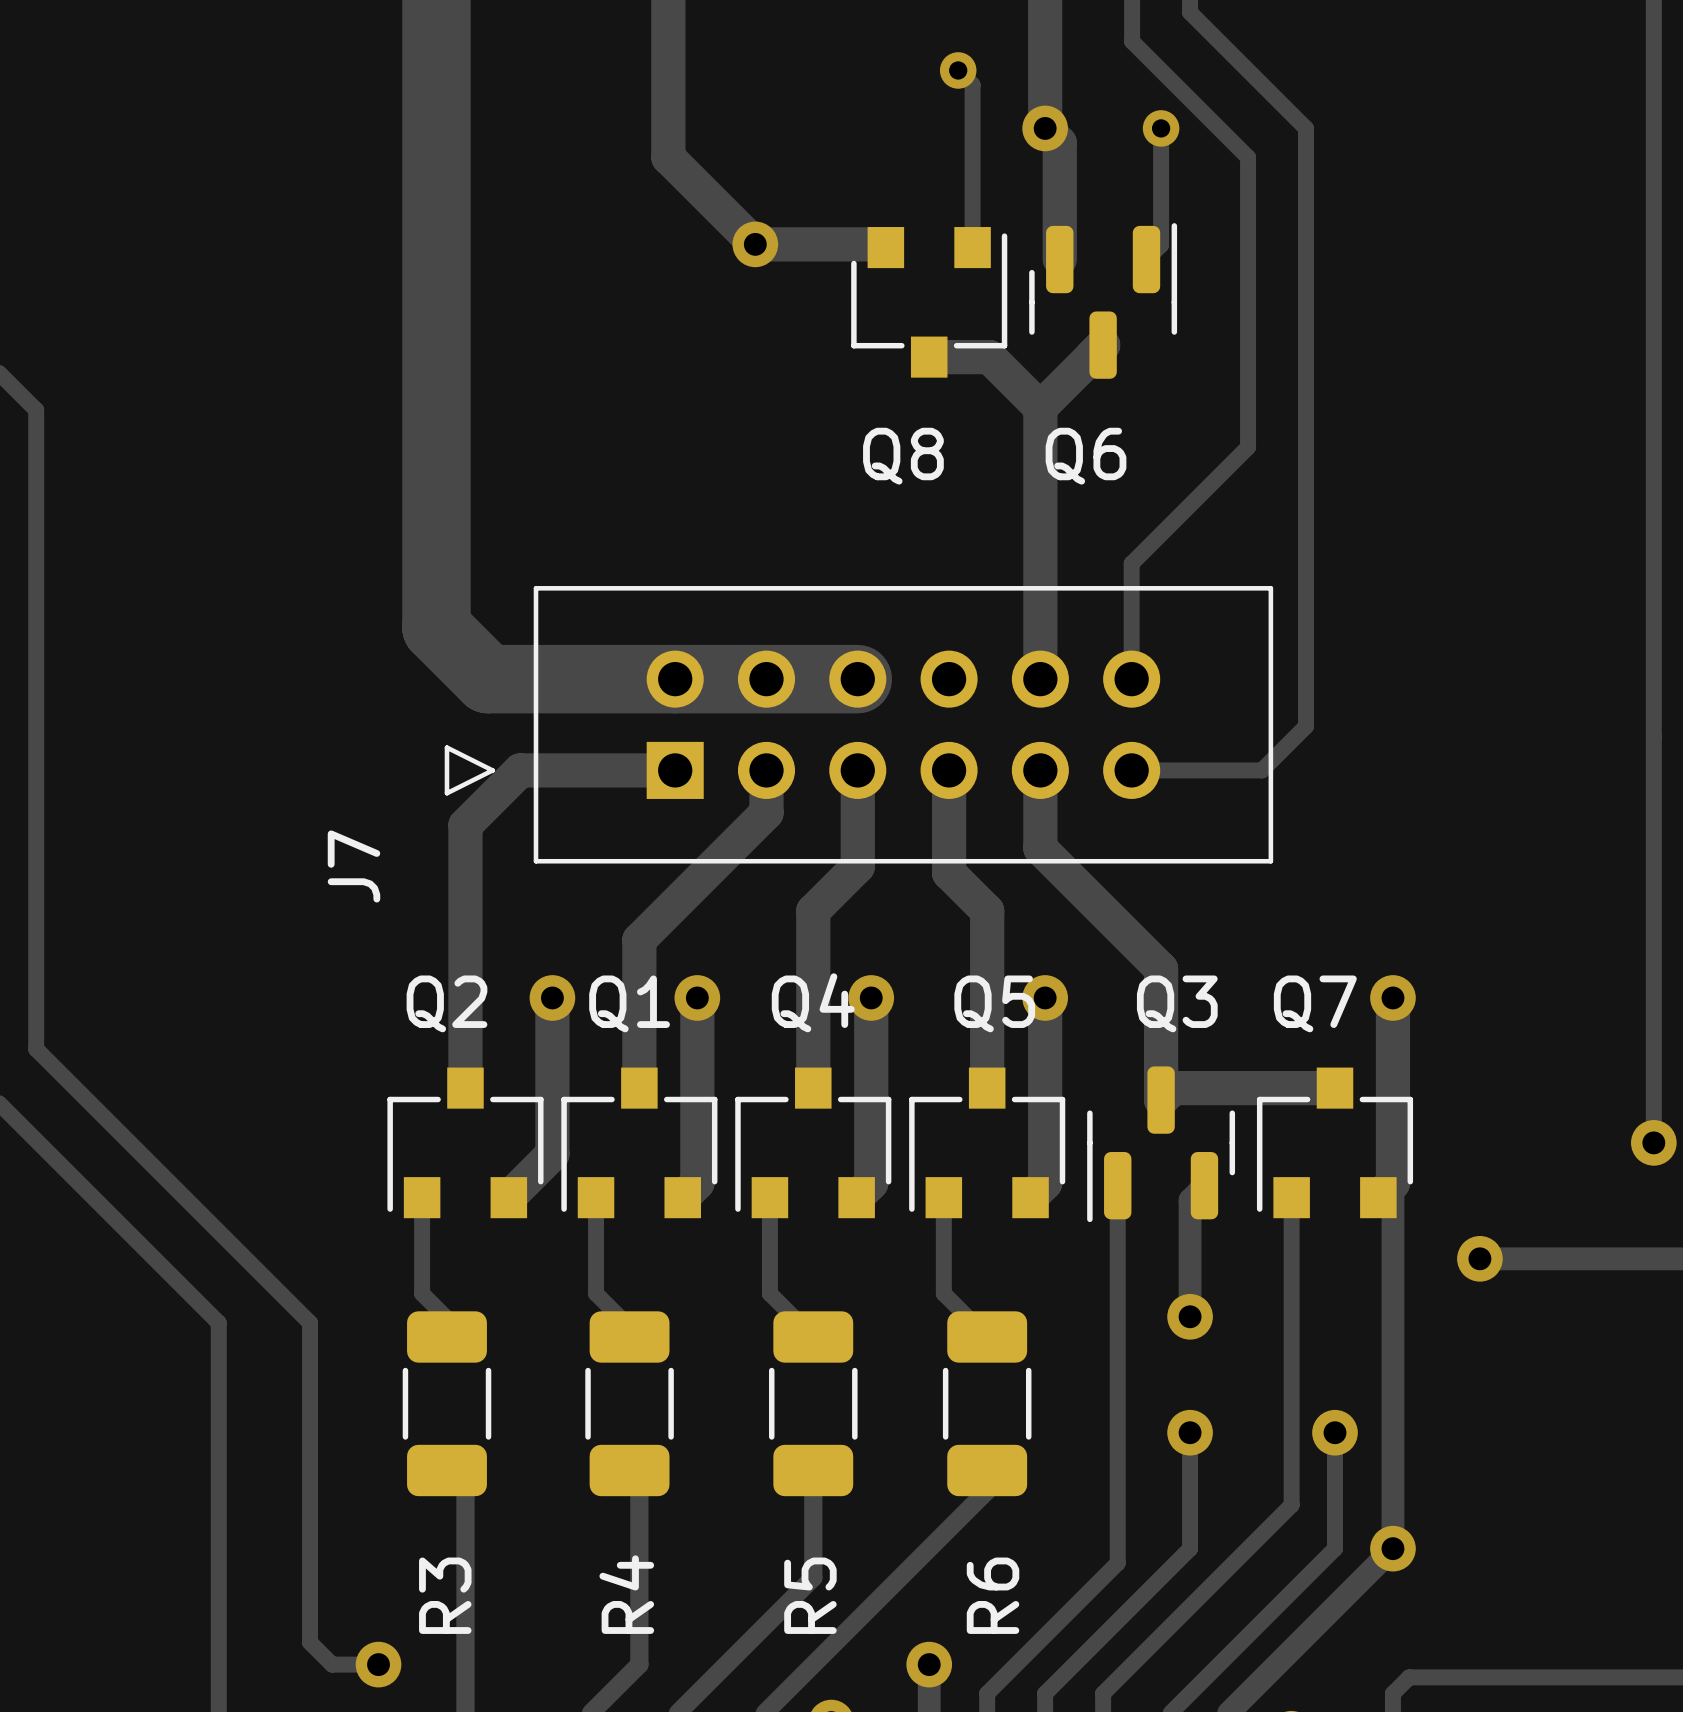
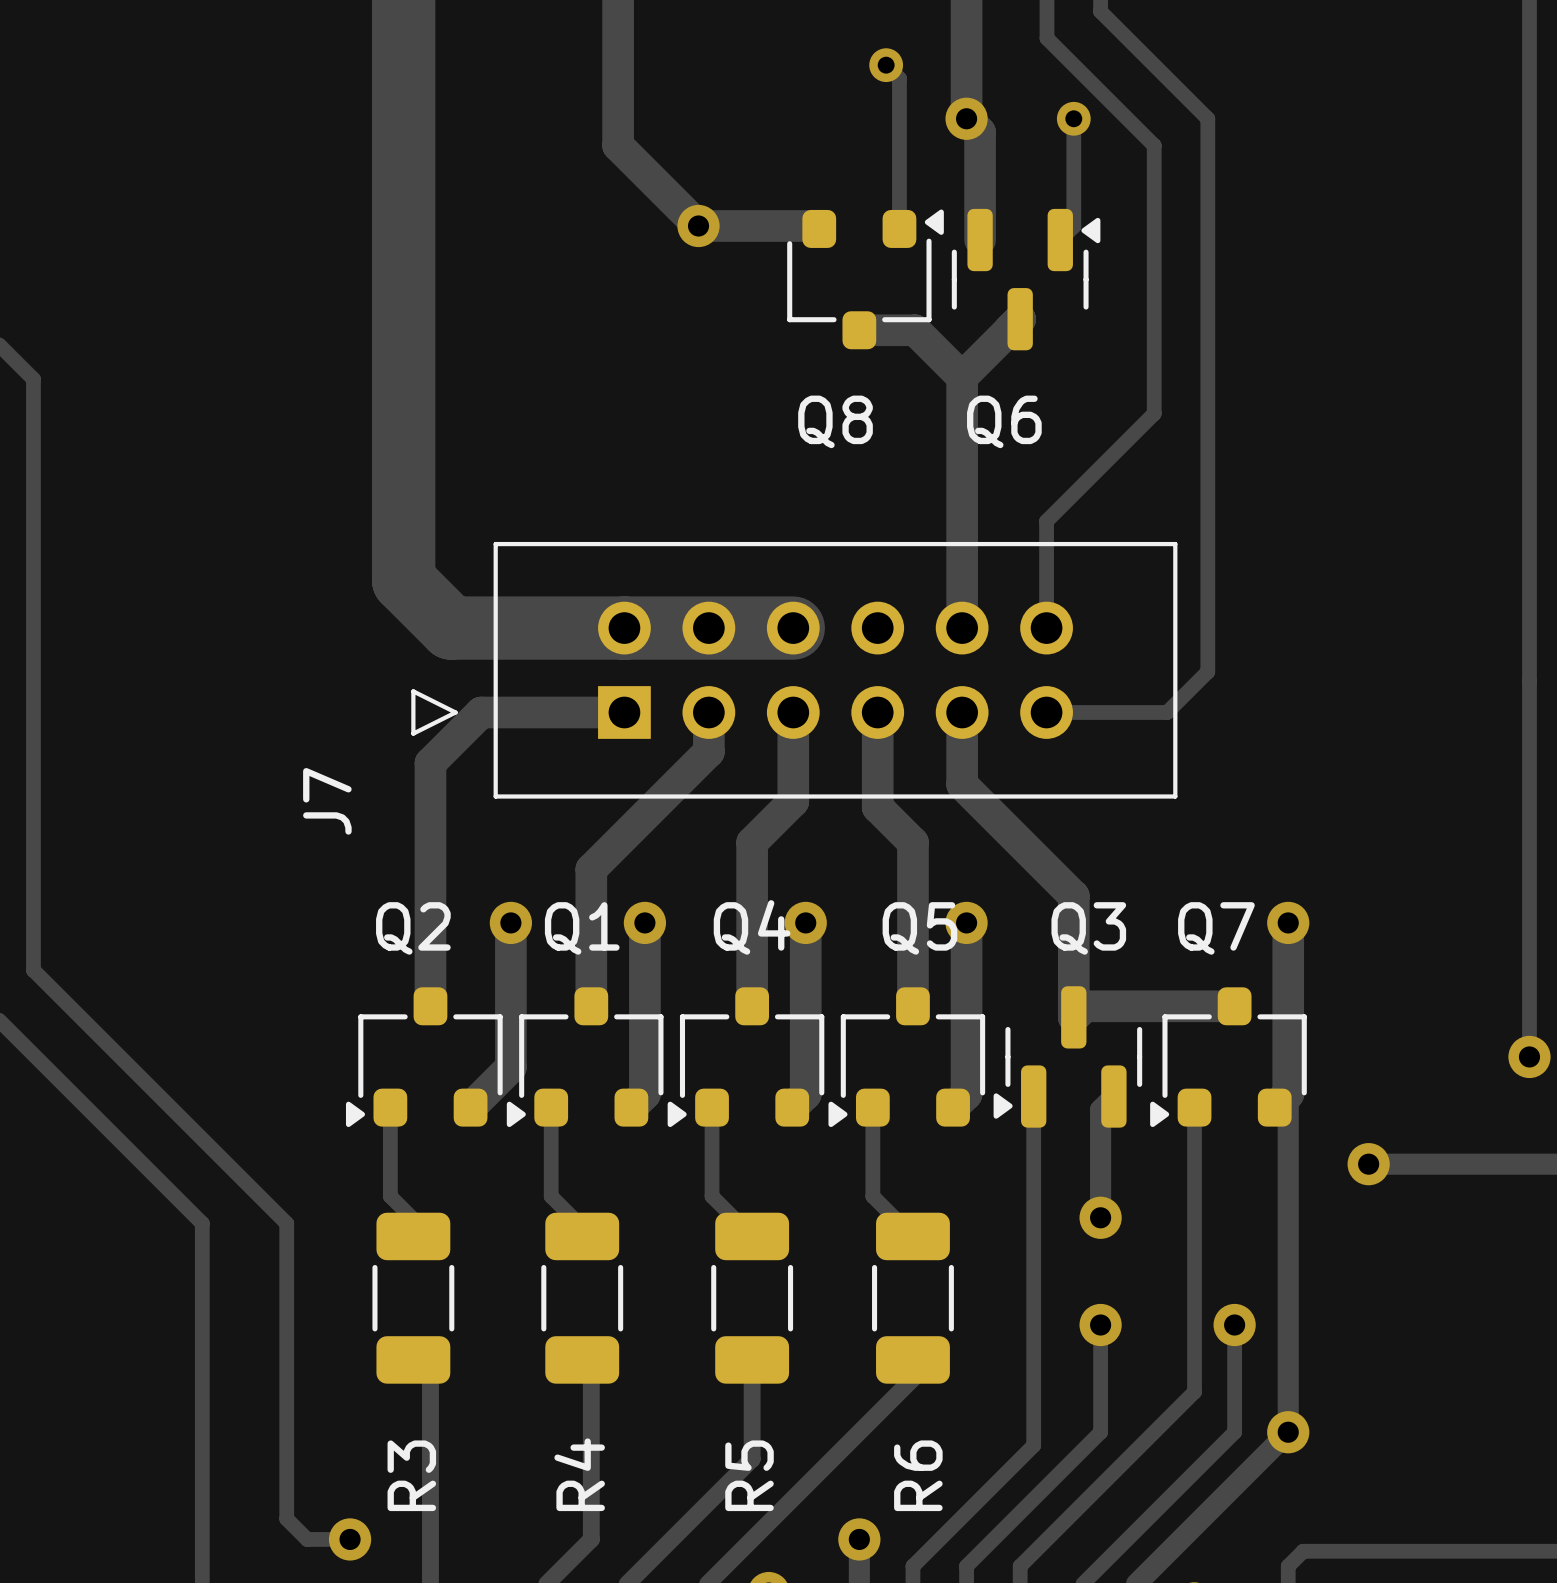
Q6 footprint: [1029, 223, 1178, 379] -> [951, 208, 1101, 351]
Q8 footprint: [851, 227, 1008, 378] -> [787, 209, 944, 350]
Q3 footprint: [1087, 1066, 1236, 1223] -> [993, 986, 1143, 1128]
Q2 footprint: [387, 1067, 544, 1219] -> [345, 987, 503, 1128]
Q1 footprint: [561, 1067, 718, 1219] -> [506, 987, 664, 1128]
Q4 footprint: [735, 1067, 892, 1219] -> [667, 987, 825, 1128]
Q5 footprint: [909, 1067, 1066, 1219] -> [828, 987, 986, 1128]
Q7 footprint: [1256, 1067, 1414, 1219] -> [1150, 987, 1307, 1128]

